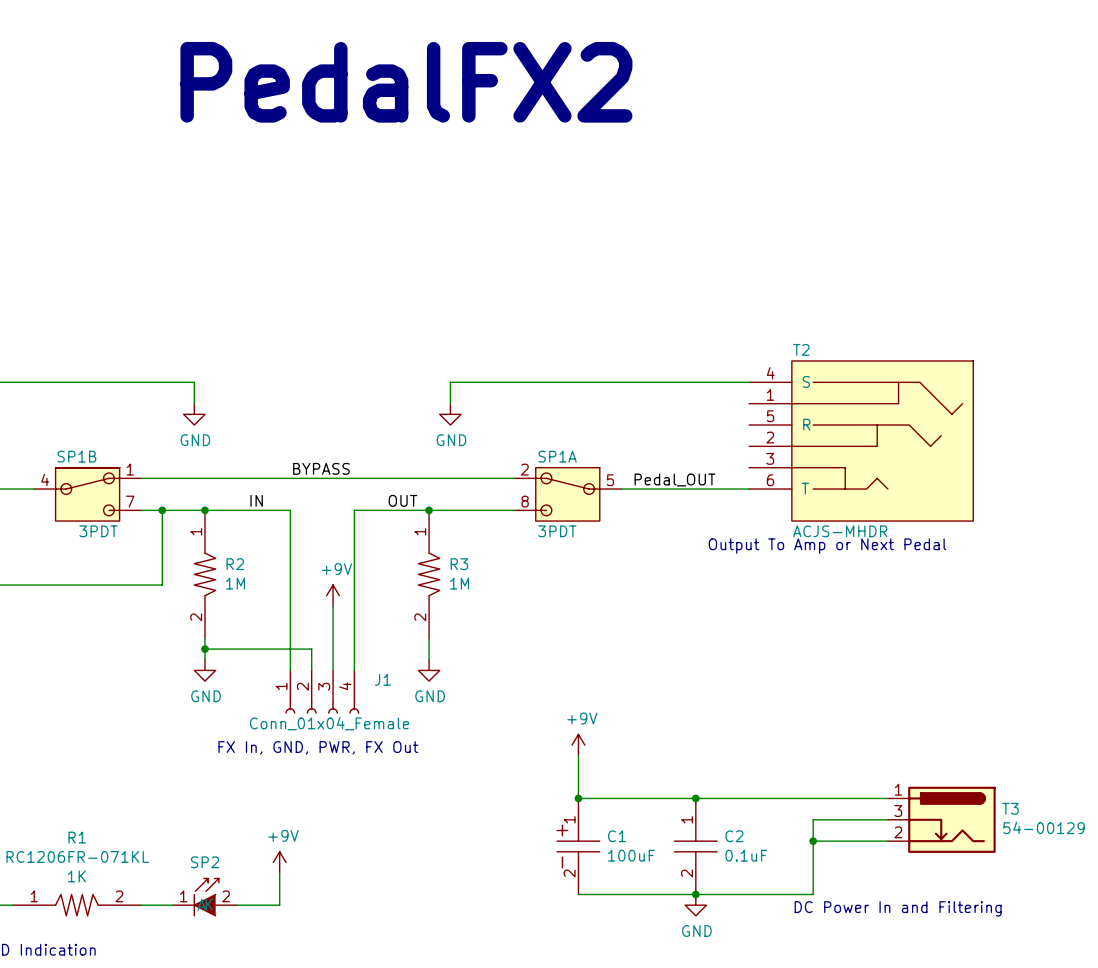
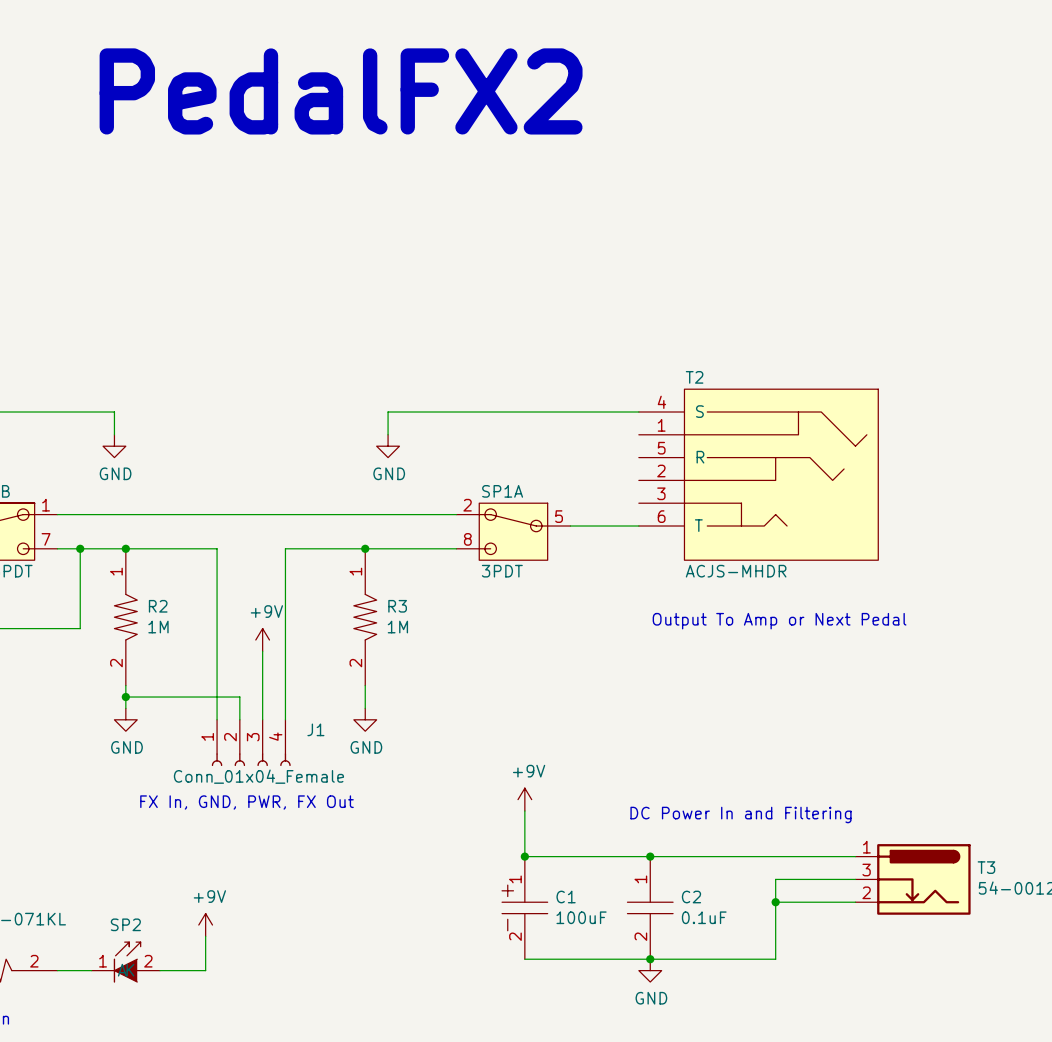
T2 position: (861, 441) -> (758, 474)
label: BYPASS (321, 468) -> none
label: Pedal_OUT (675, 480) -> none
label: IN (256, 500) -> none
label: OUT (402, 500) -> none
text position: Output To Amp or Next Pedal (827, 546) -> Output To Amp or Next Pedal (779, 621)
text position: DC Power In and Filtering (898, 908) -> DC Power In and Filtering (741, 814)

